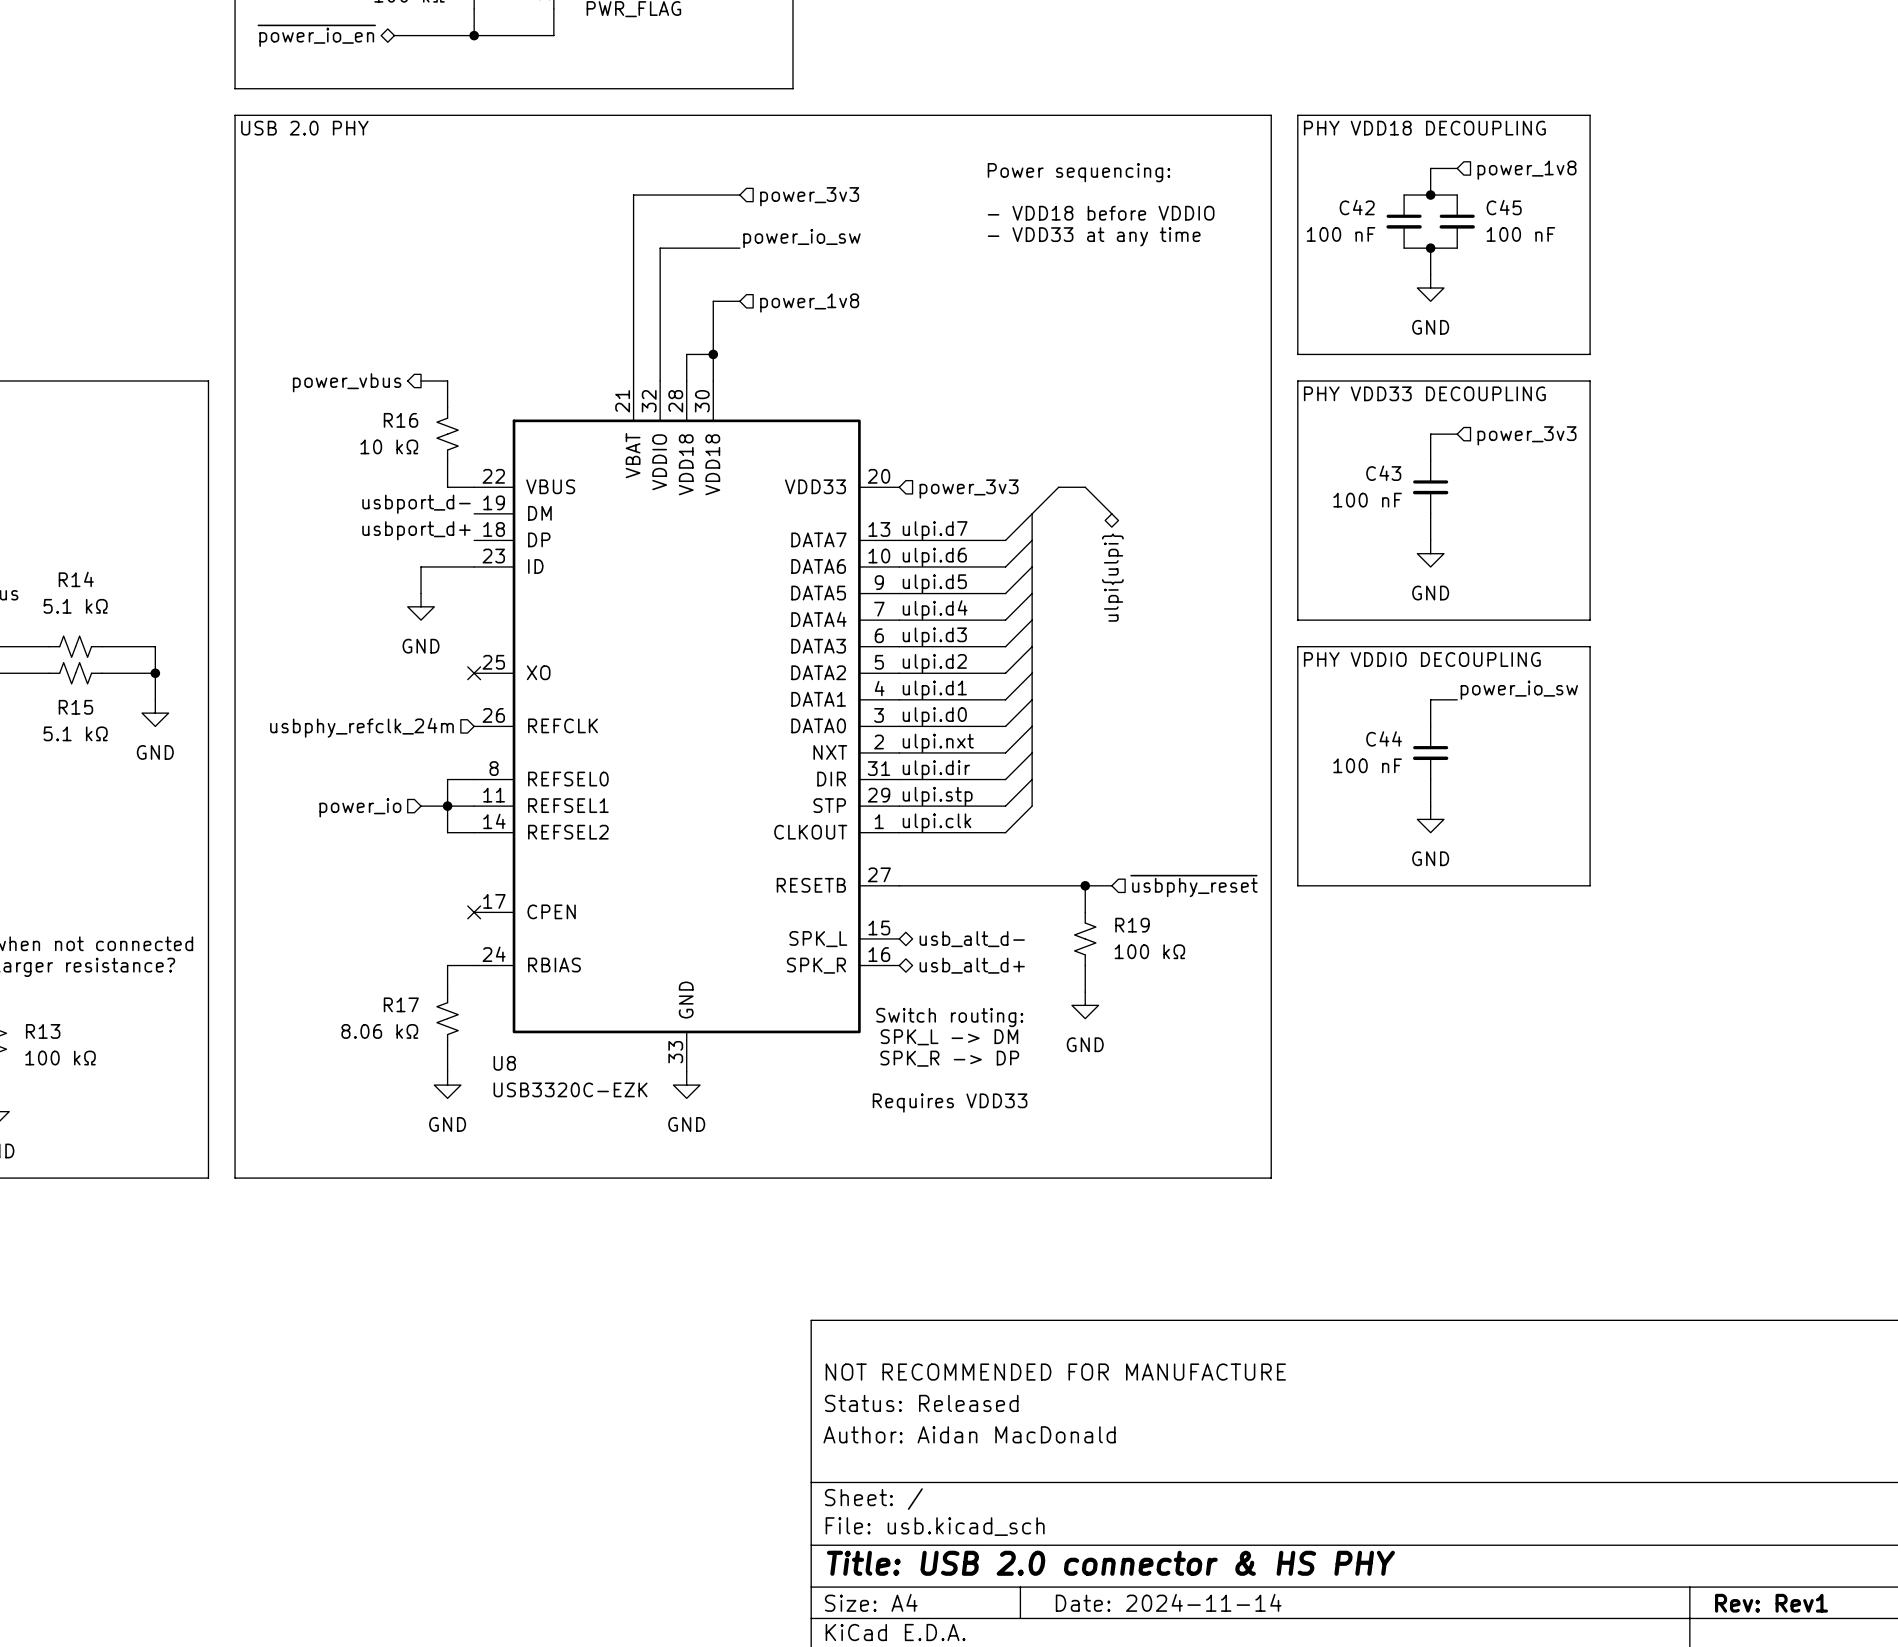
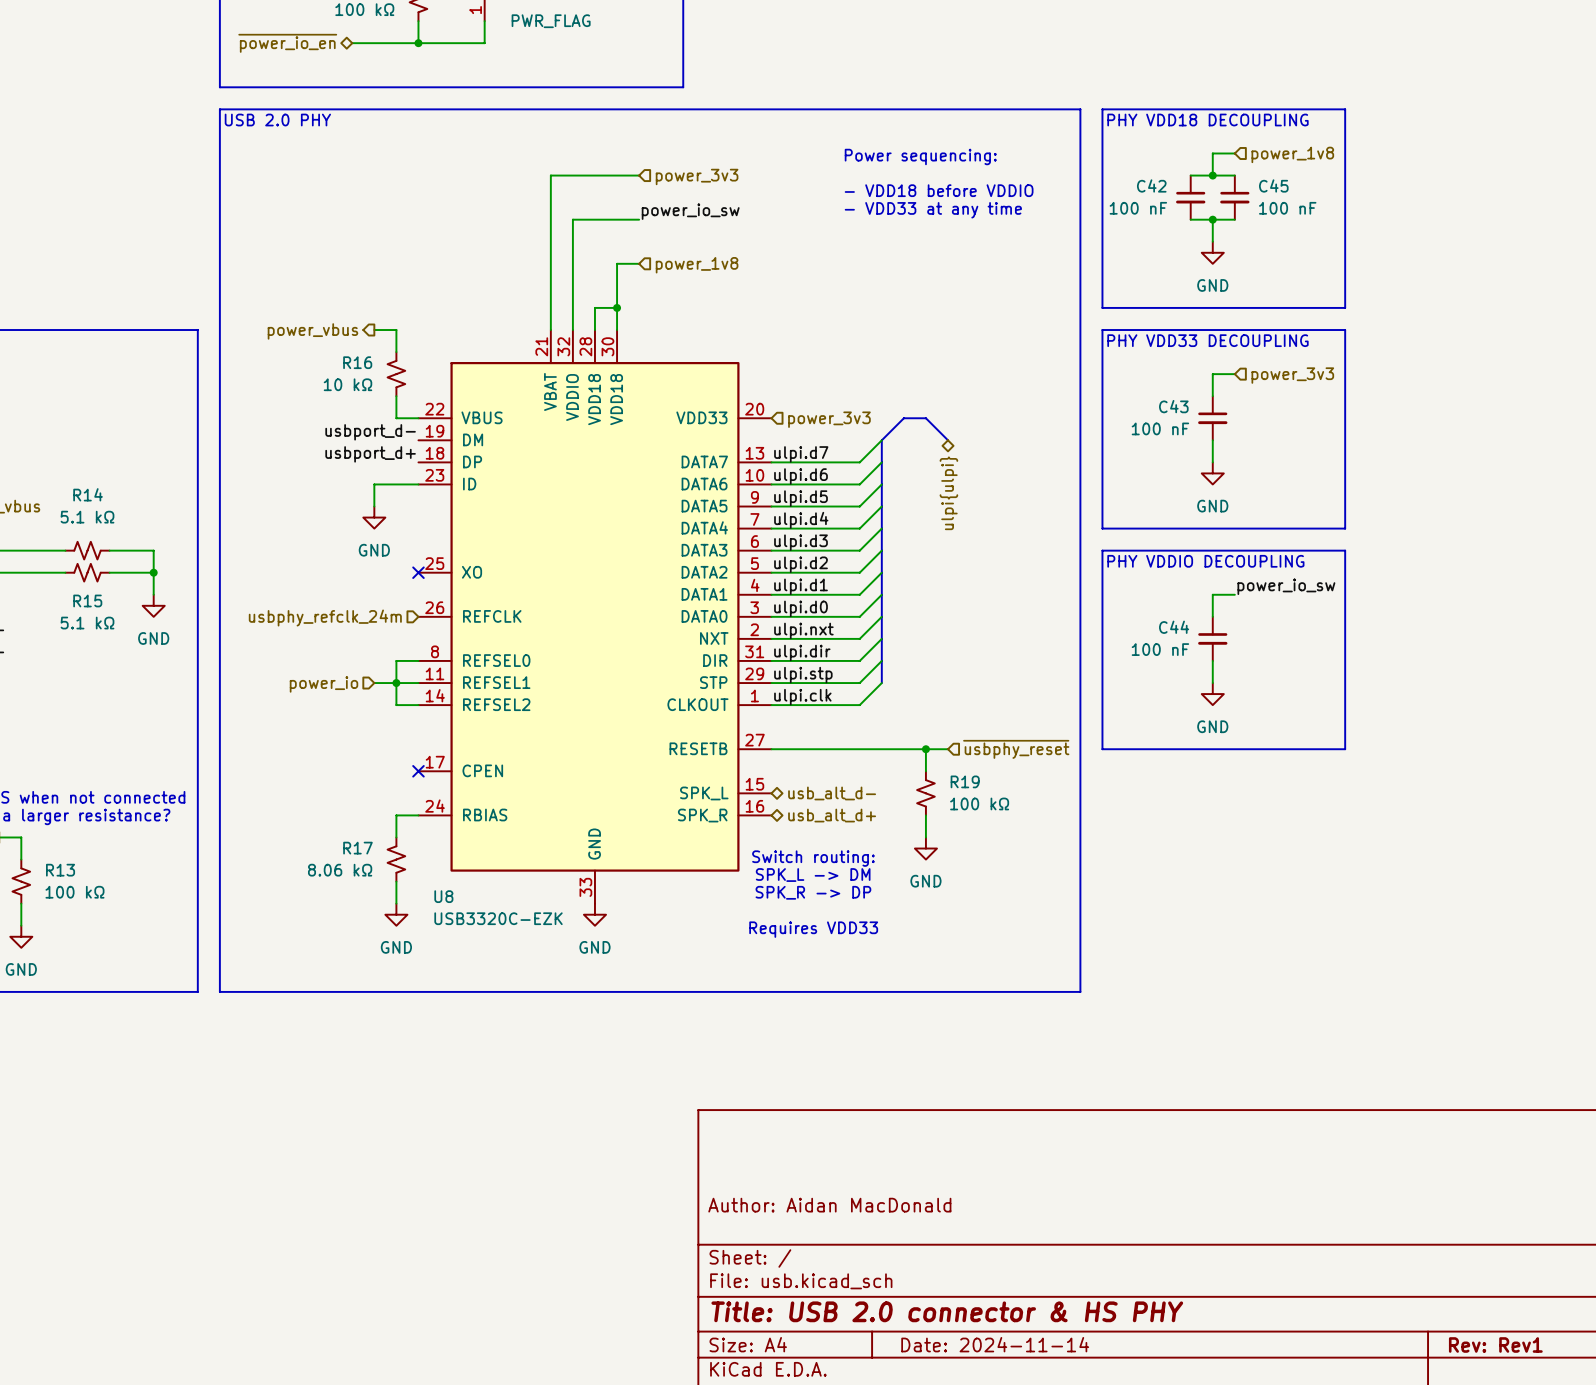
title block: NOT RECOMMENDED FOR MANUFACTURE (1055, 1372) -> none
title block: Status: Released (921, 1403) -> none

